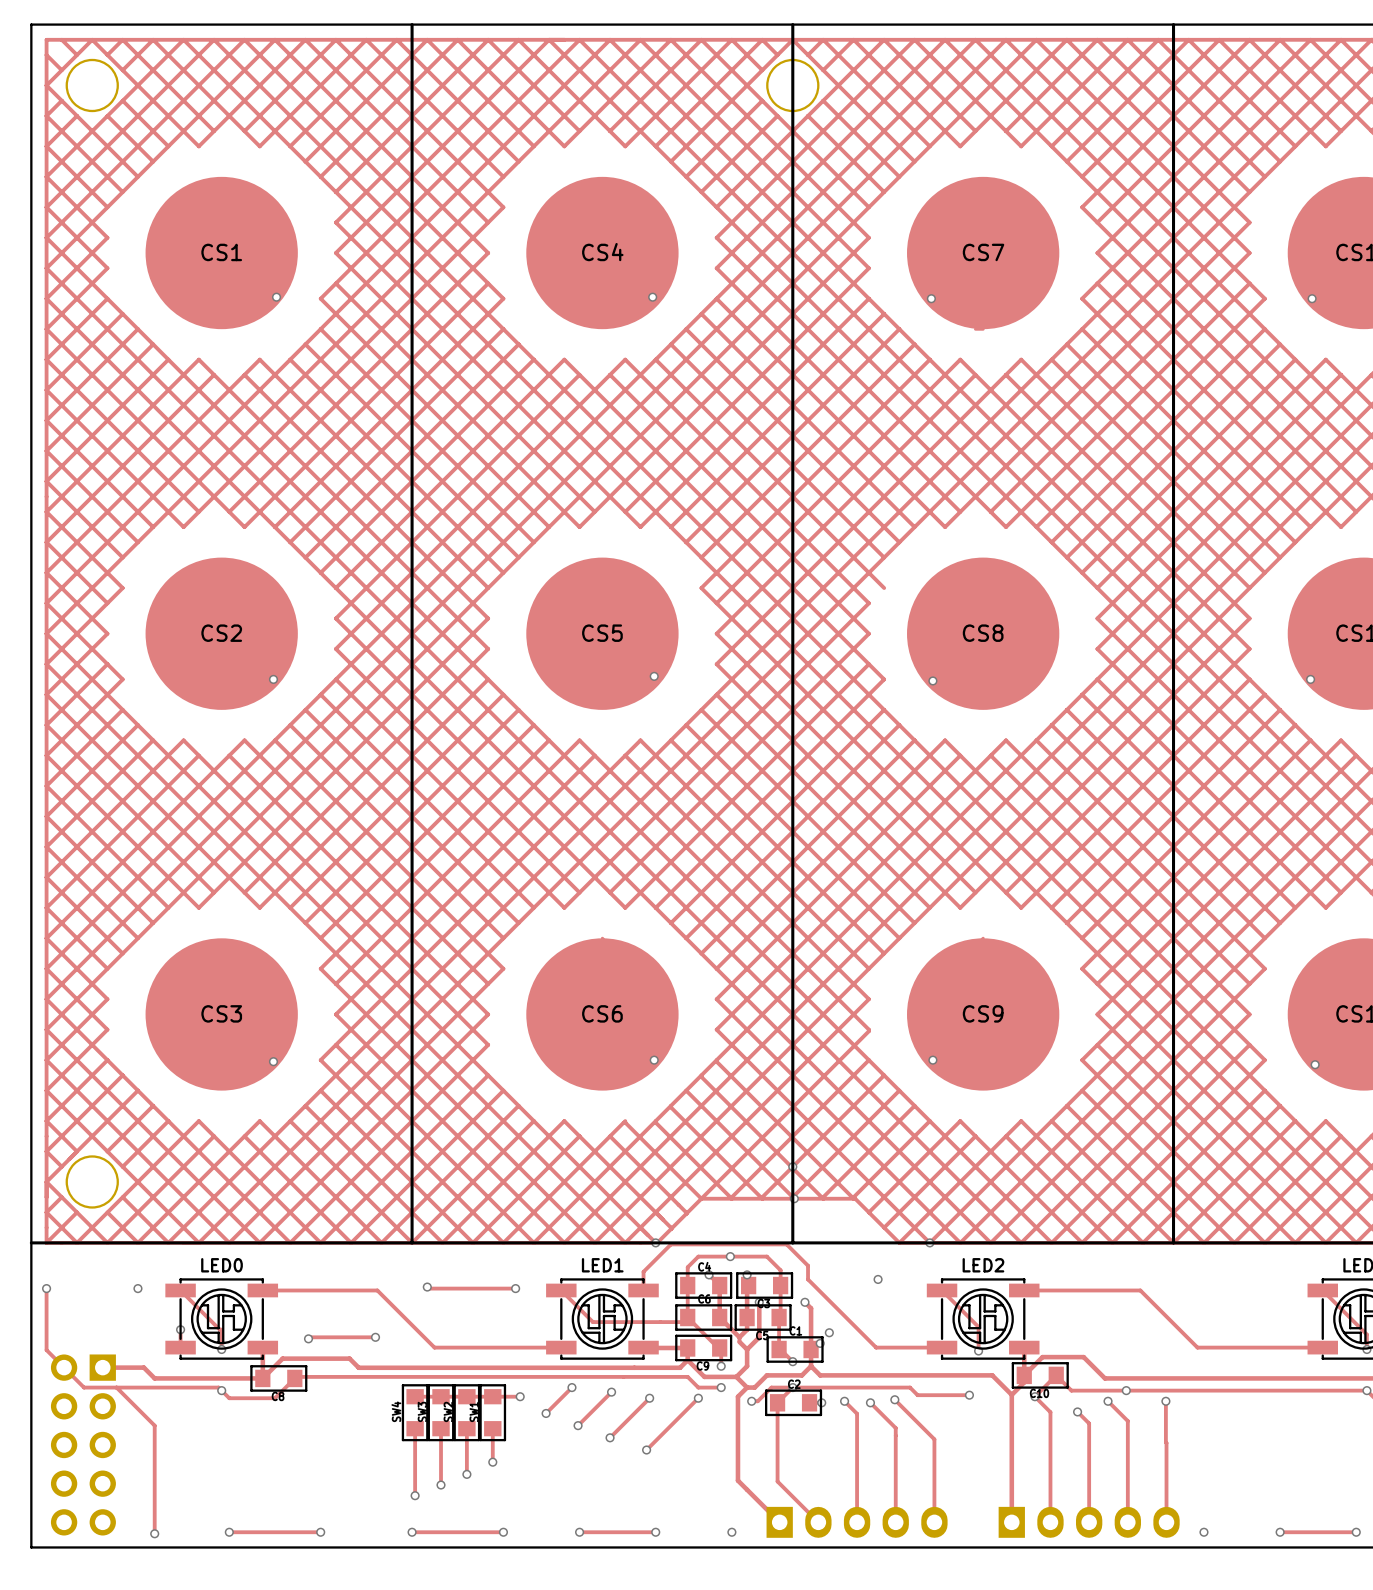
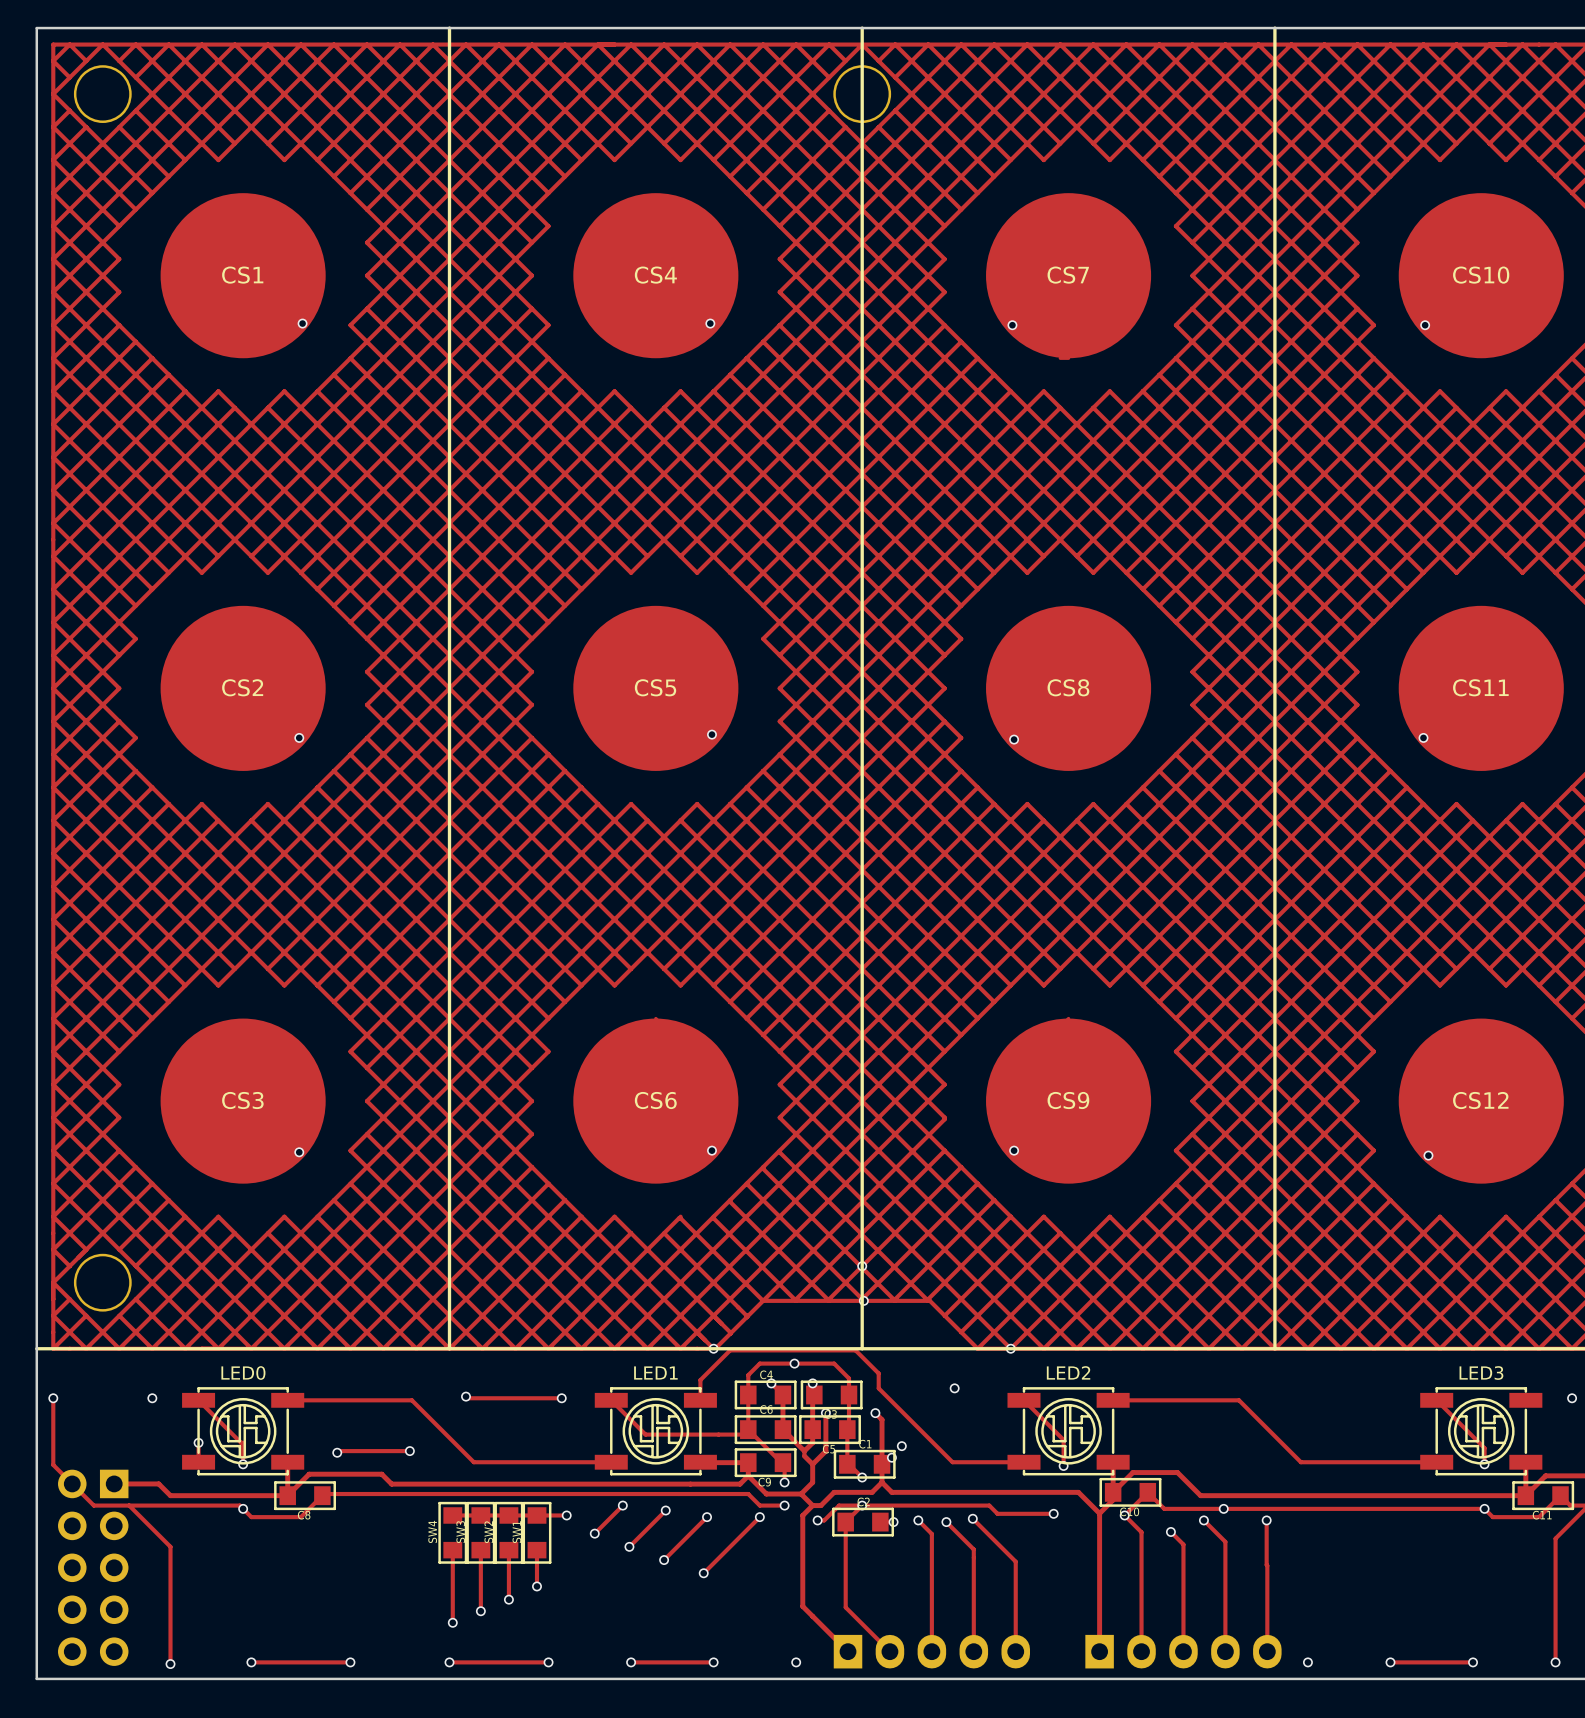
track: none -> (69, 44) (53, 61)
track: none -> (961, 638) (944, 655)

